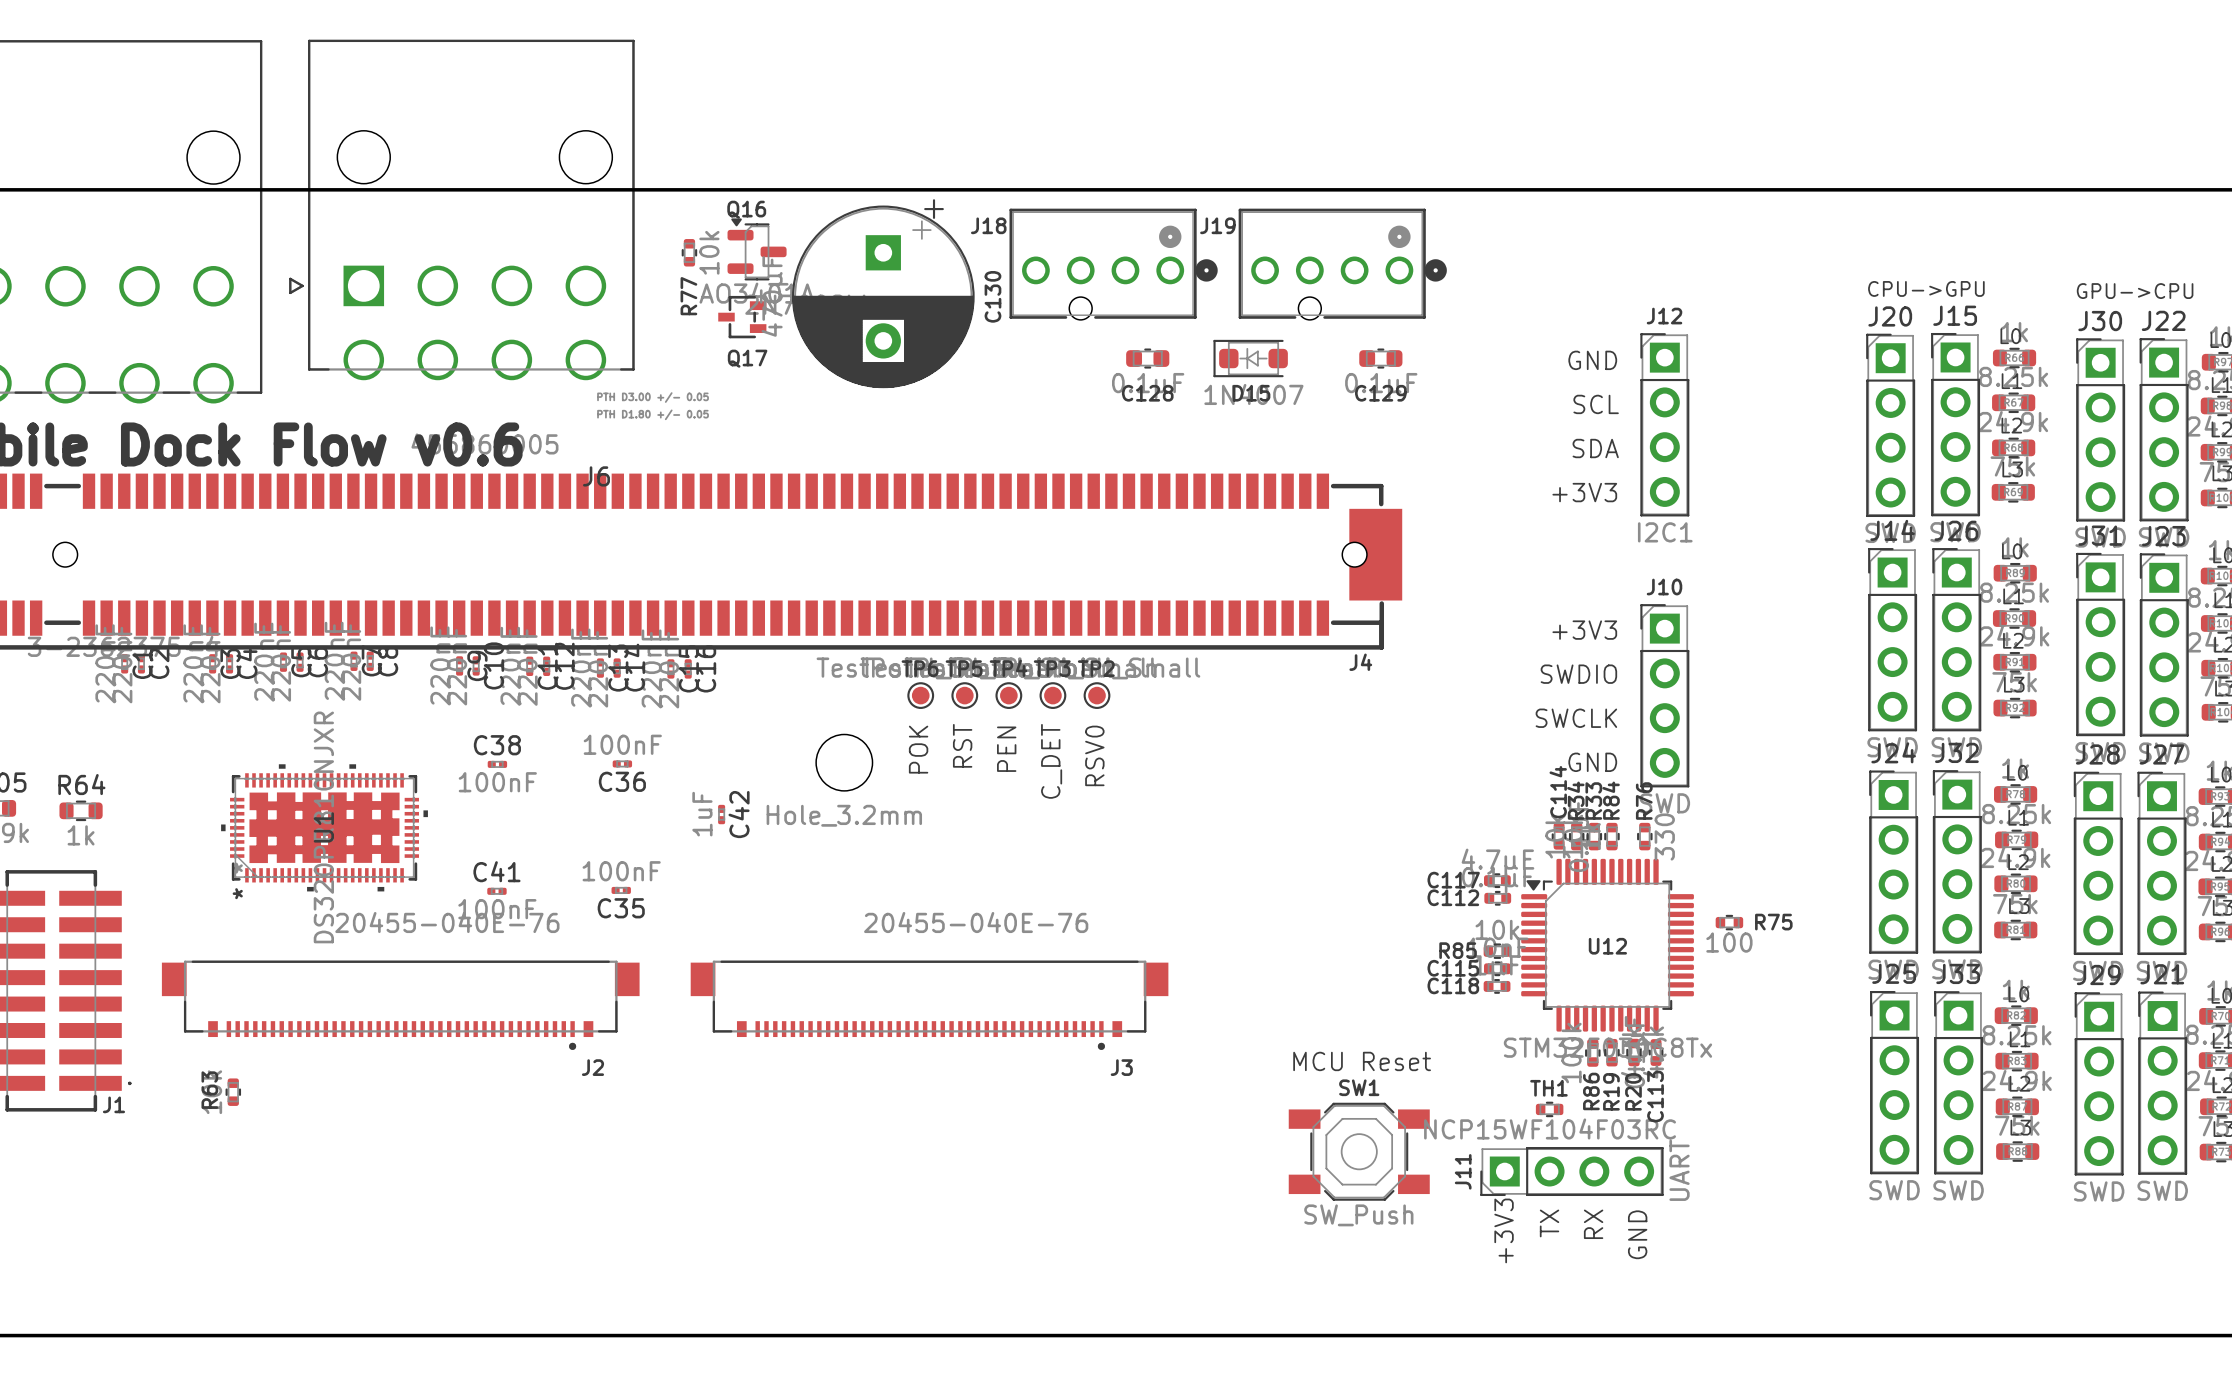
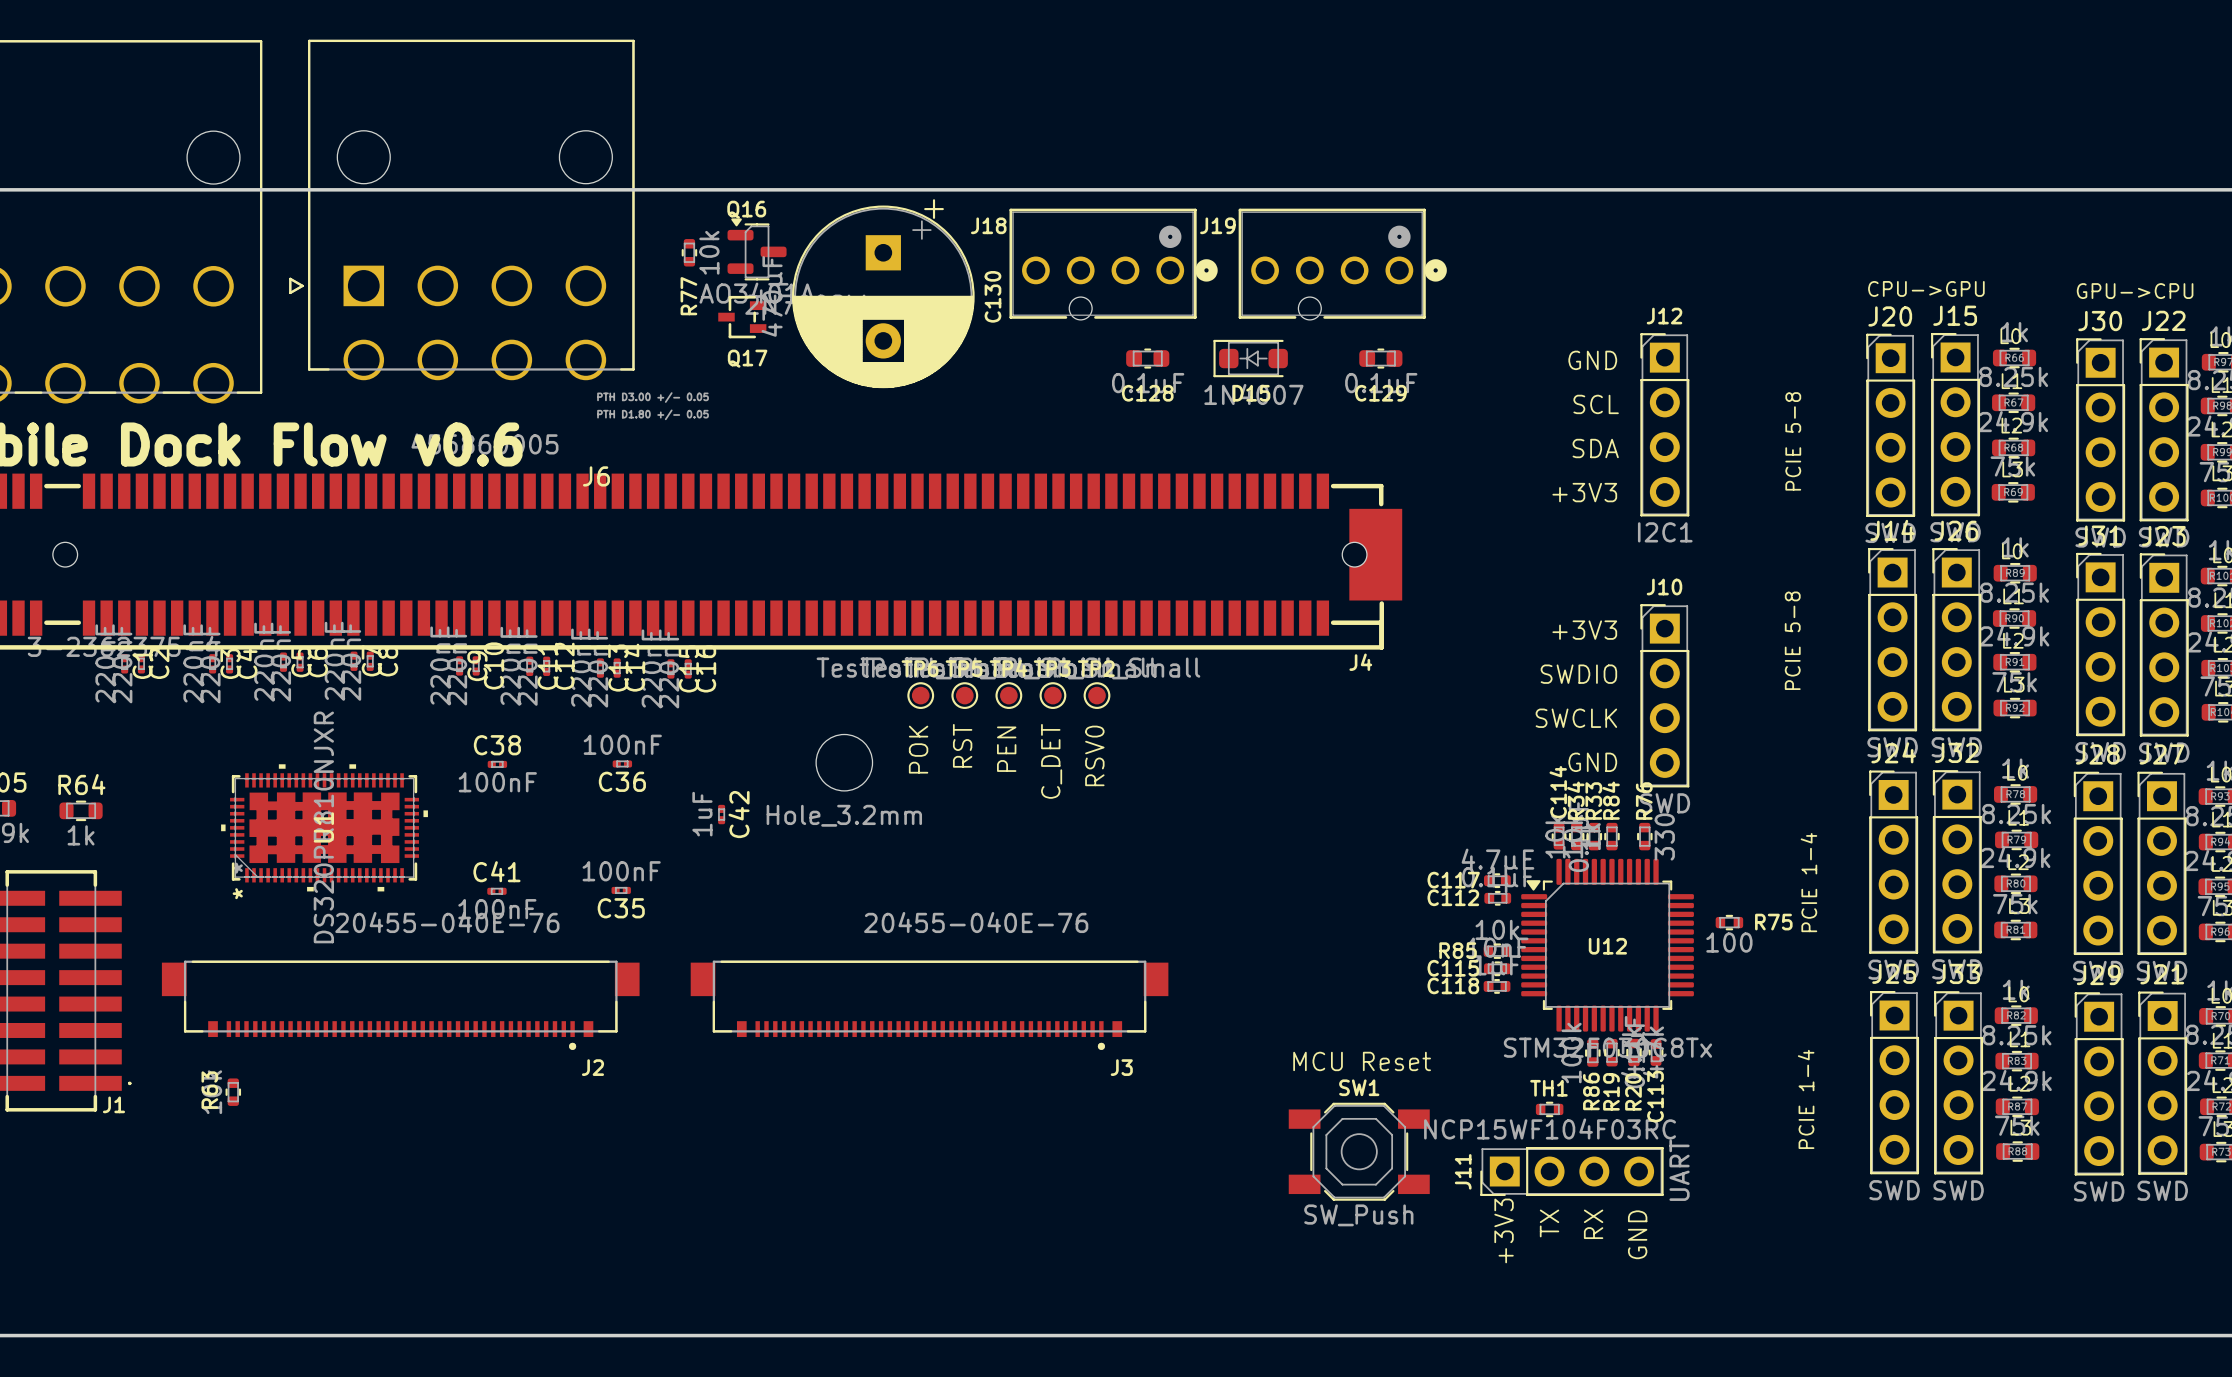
text: none -> PCIE 5-8 (1793, 441)
text: none -> PCIE 5-8 (1792, 640)
text: none -> PCIE 1-4 (1808, 882)
text: none -> PCIE 1-4 (1806, 1099)

